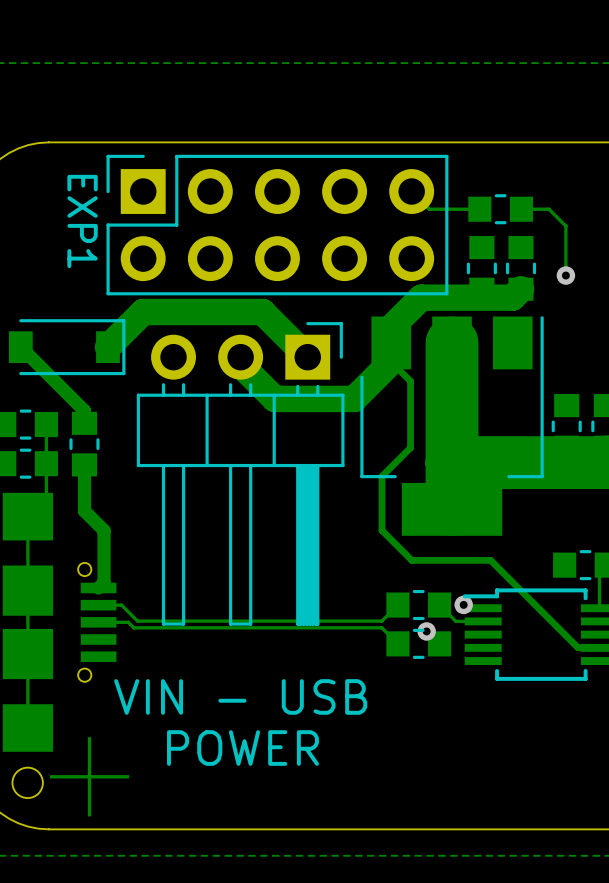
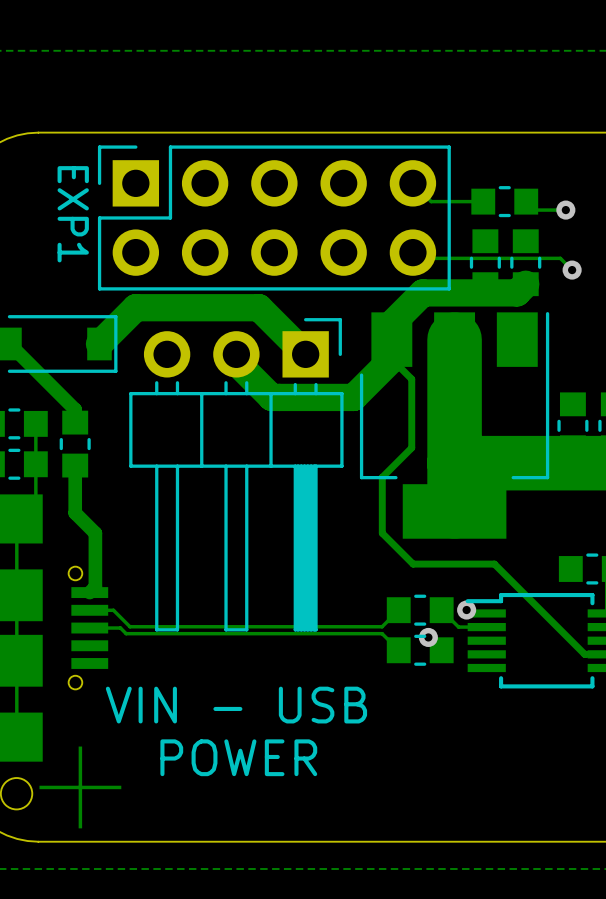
track: (521, 209) (549, 209) (565, 226) (565, 275) -> (526, 201) (534, 210) (565, 210)
via: none -> (565, 210)
track: none -> (412, 252) (418, 258) (560, 258) (572, 270)

